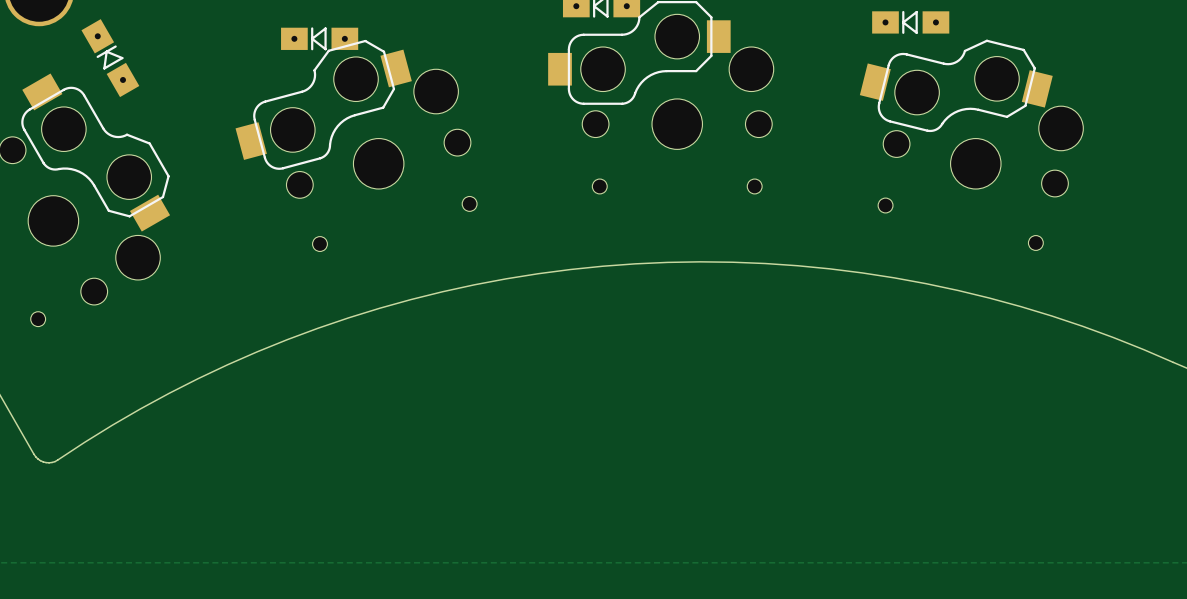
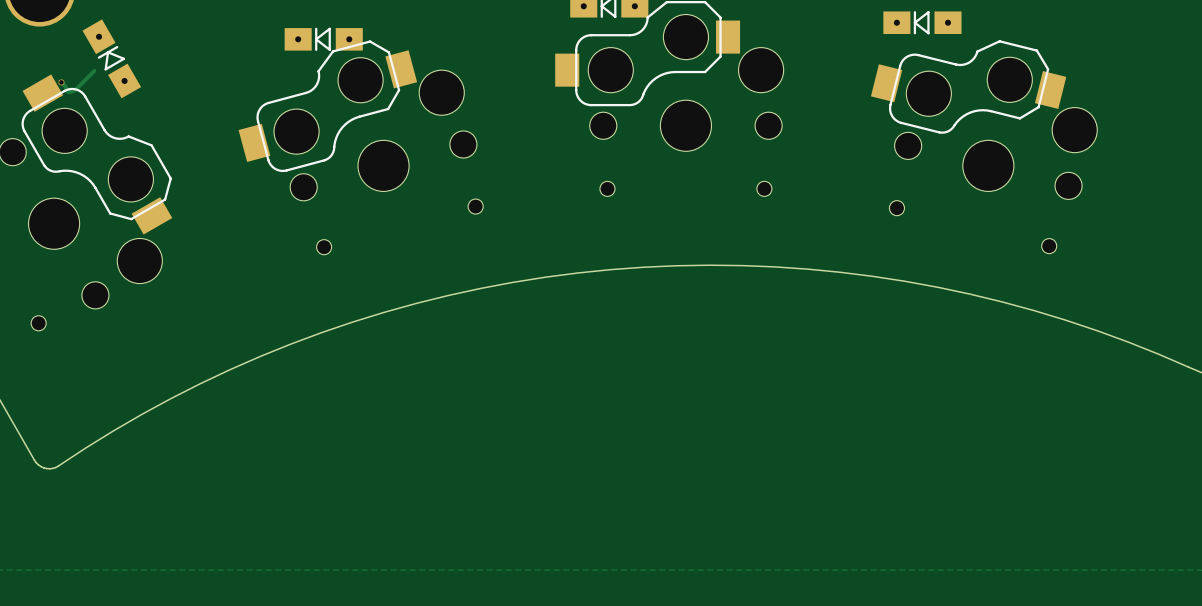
track: none -> (94, 70) (73, 91) (67, 91) (61, 82)
via: none -> (61, 82)

